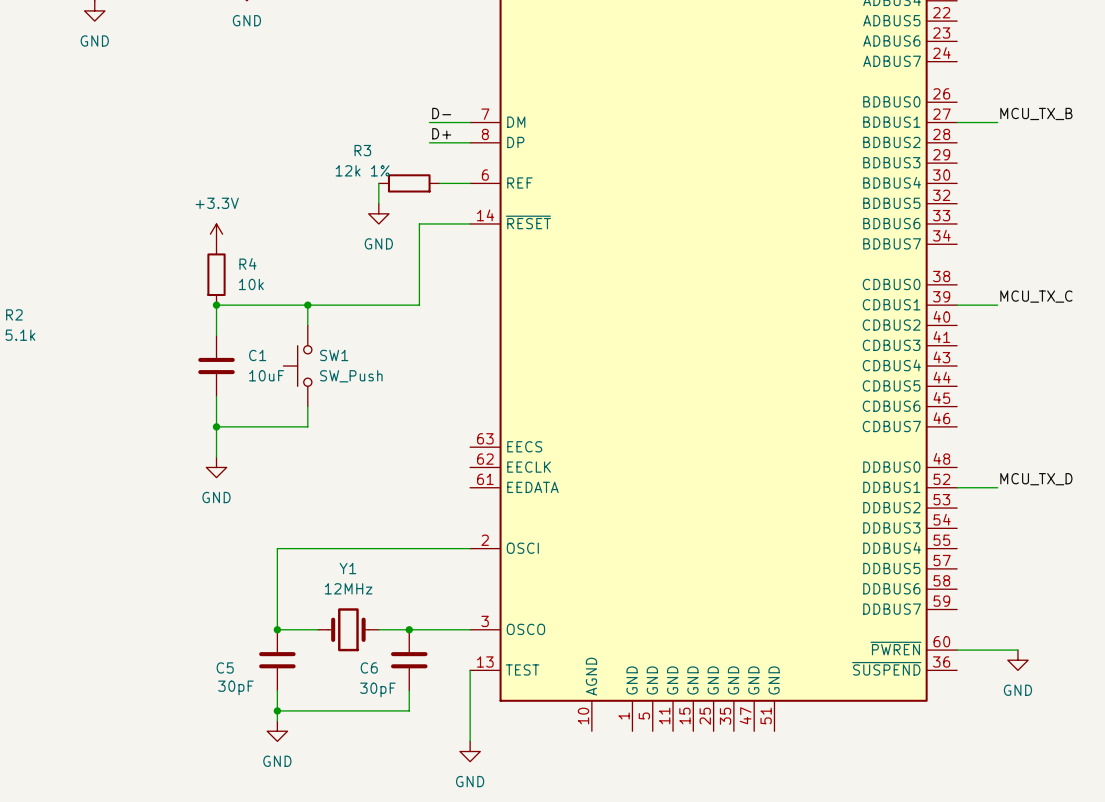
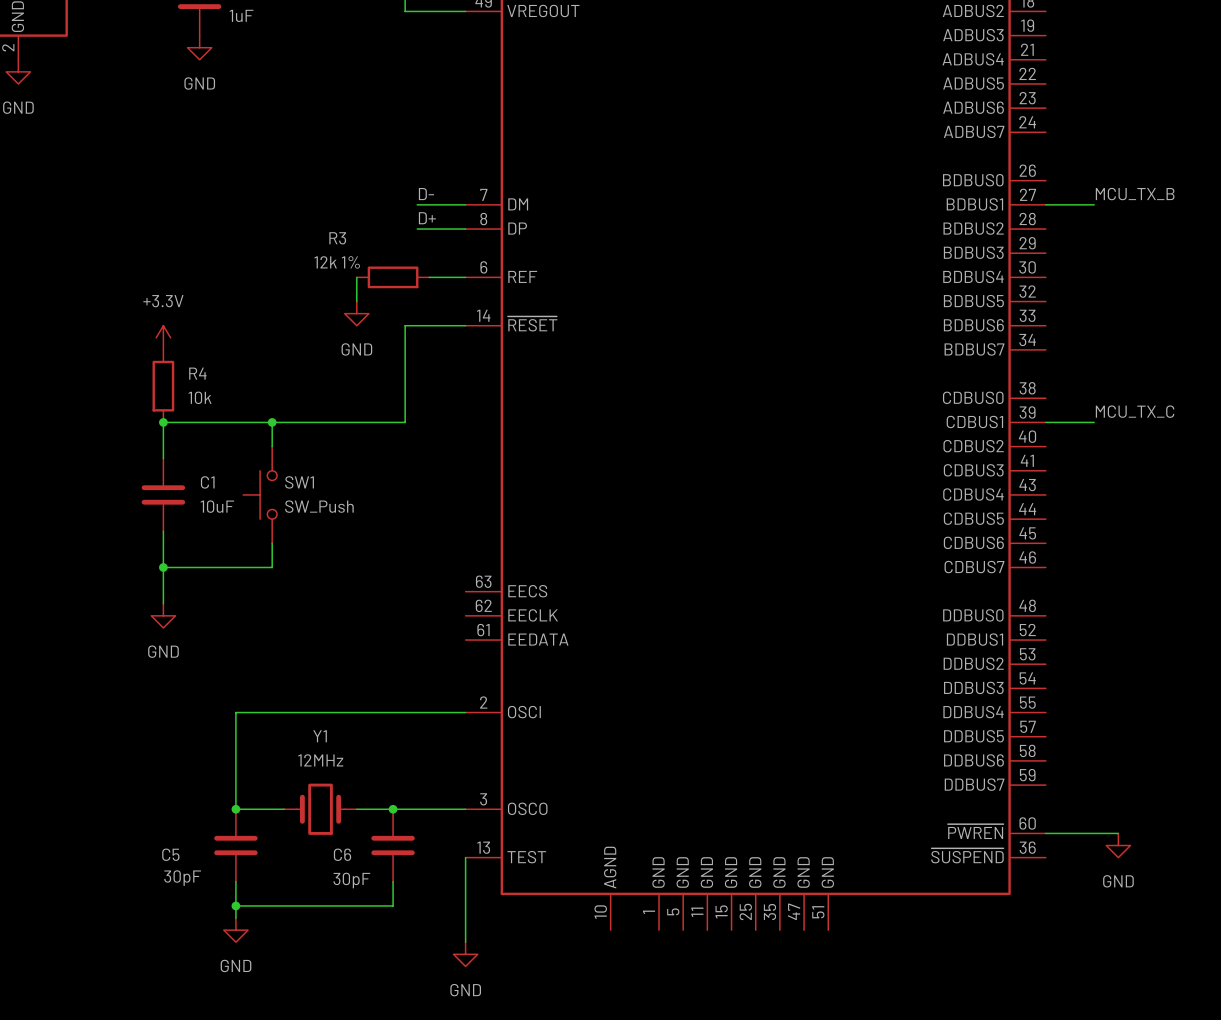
label: MCU_TX_D (1036, 479) -> none
wire: (957, 487) (997, 487) -> none

